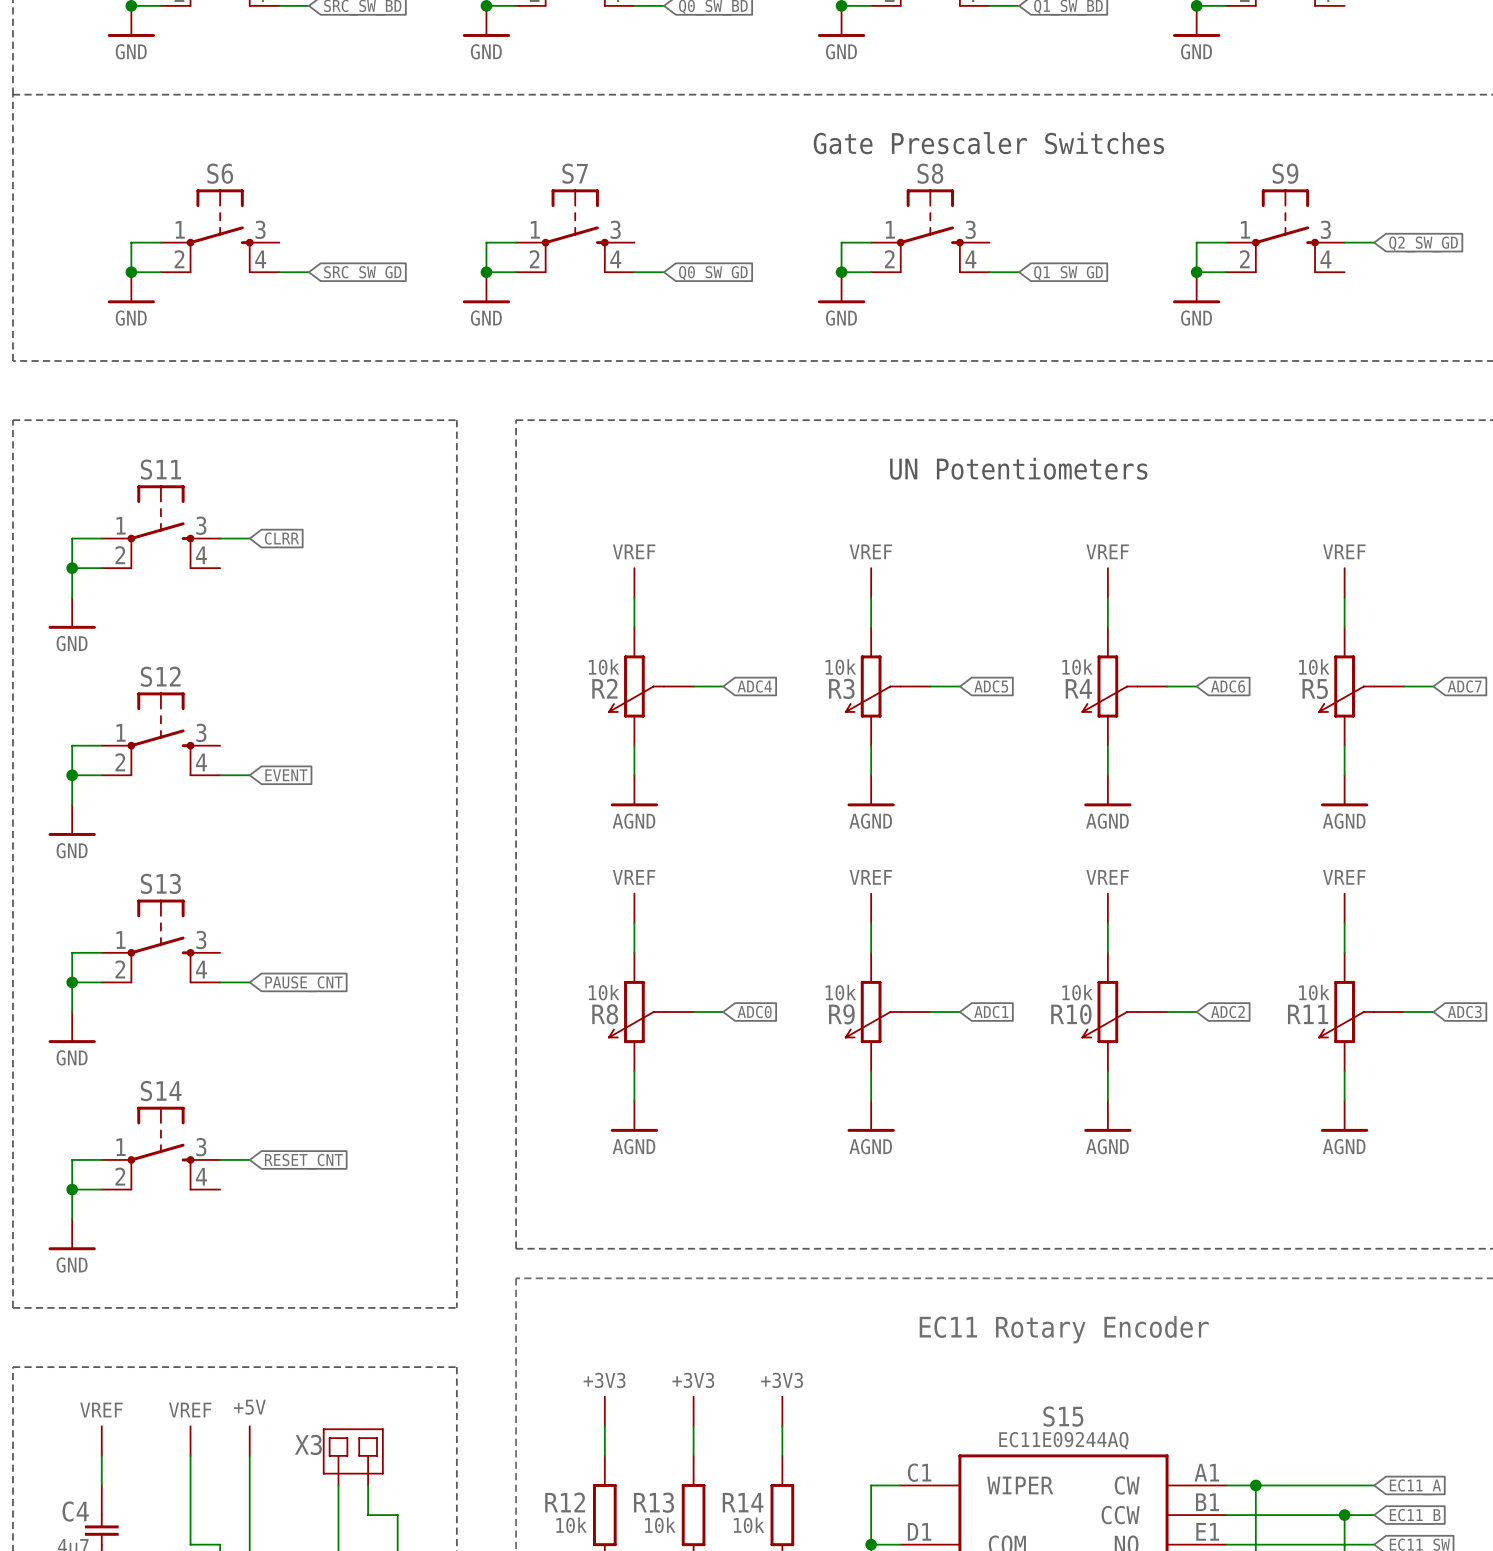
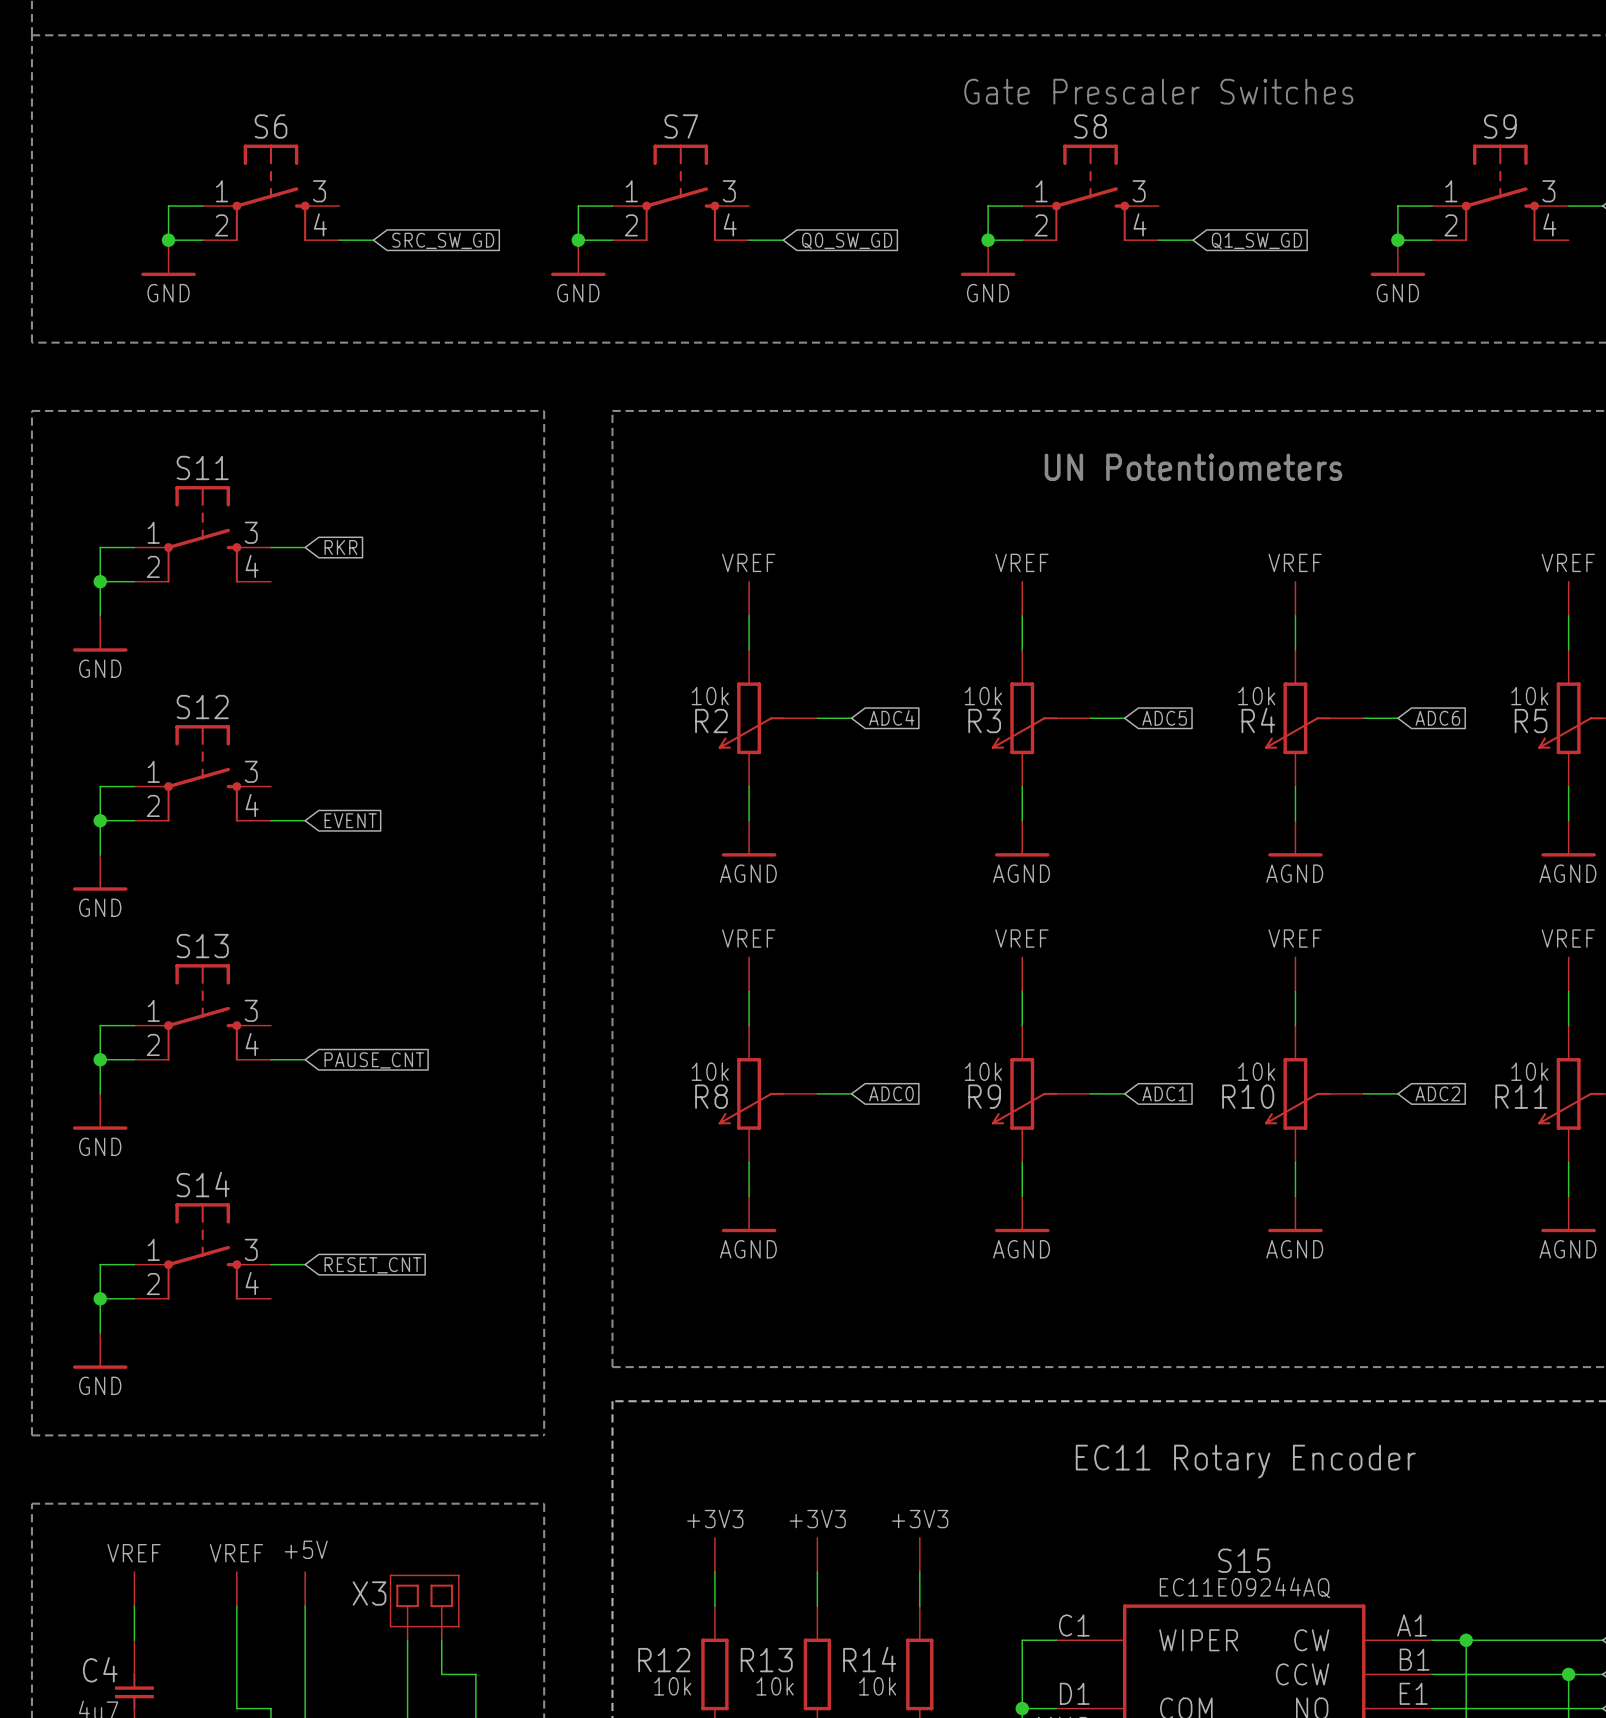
global label: CLRR (282, 538) -> RKR (340, 547)

